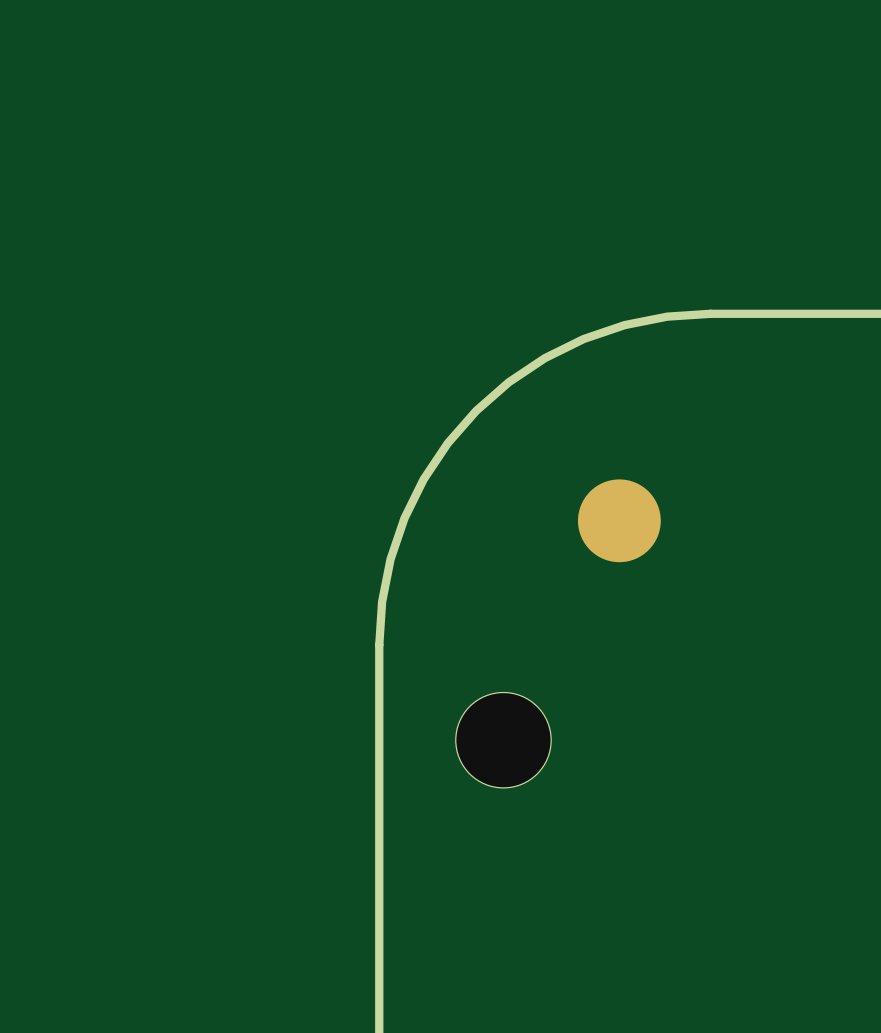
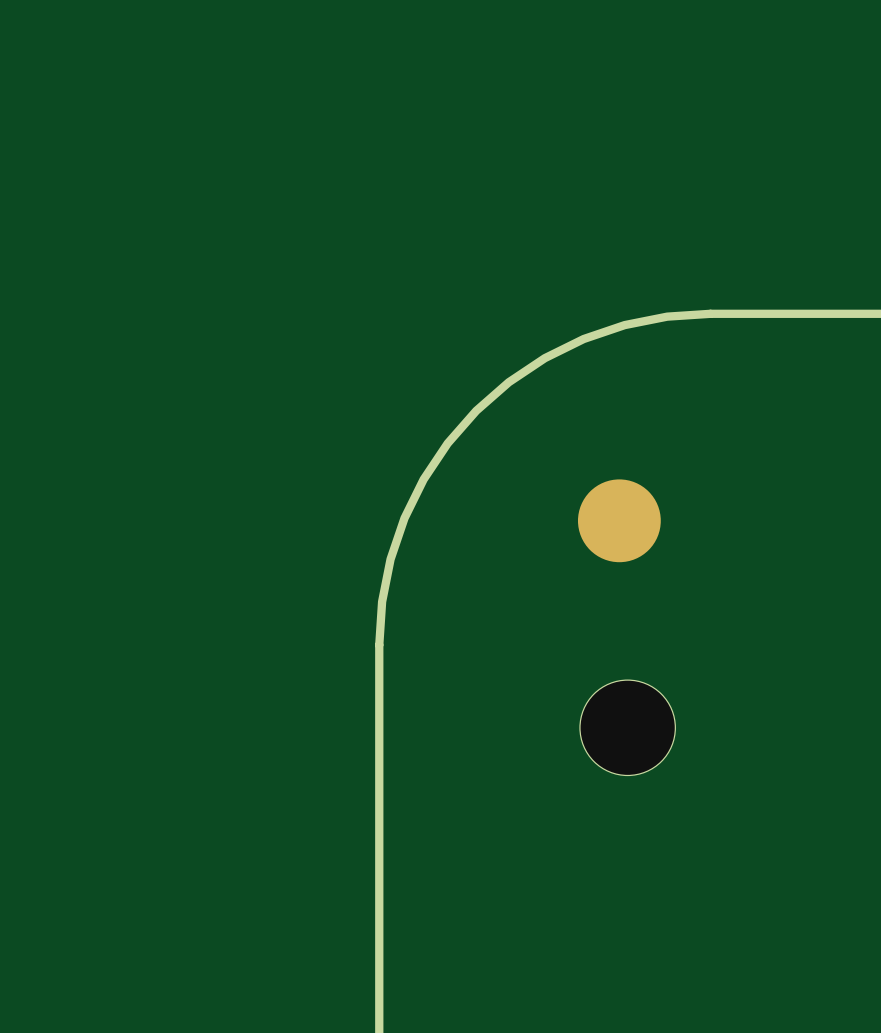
part position: (503, 740) -> (627, 727)

